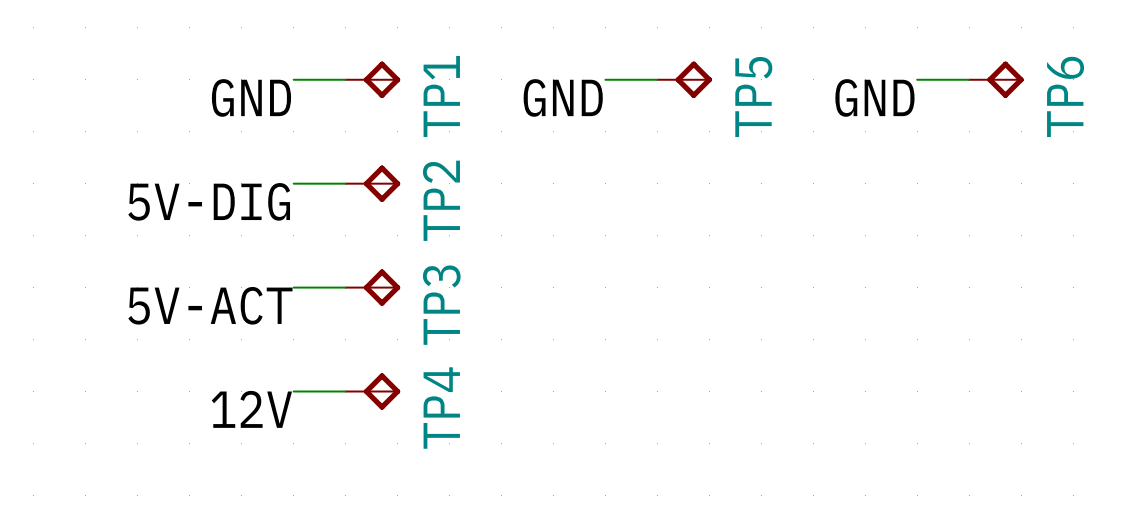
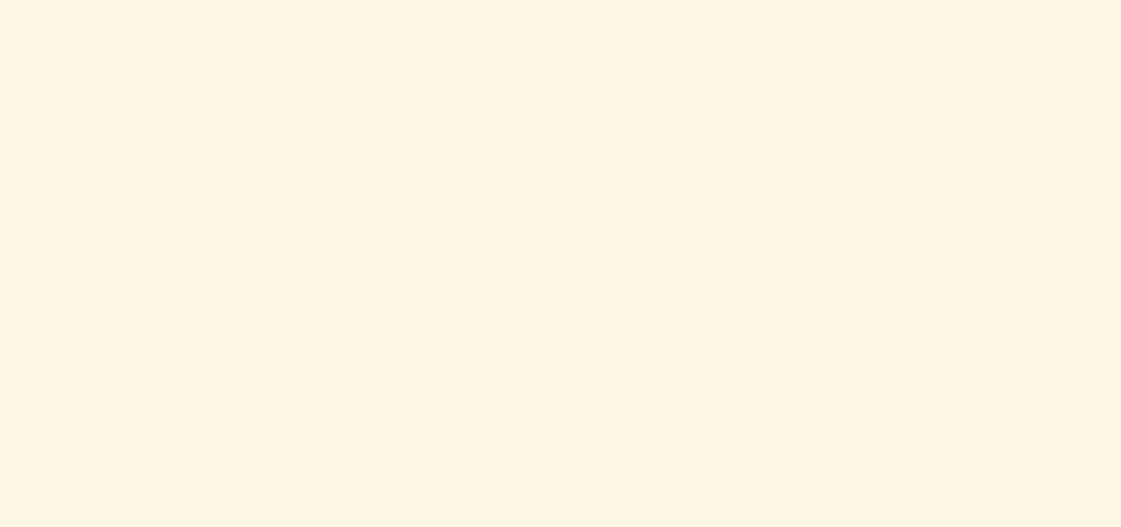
wire: (293, 79) (345, 79) -> none
TP1: (372, 79) -> none
wire: (605, 79) (657, 79) -> none
TP5: (684, 79) -> none
wire: (917, 79) (969, 79) -> none
TP6: (996, 79) -> none
label: GND (251, 97) -> none
label: GND (563, 97) -> none
label: GND (874, 97) -> none
wire: (293, 183) (345, 183) -> none
TP2: (372, 183) -> none
label: 5V-DIG (209, 201) -> none
wire: (293, 287) (345, 287) -> none
TP3: (372, 287) -> none
label: 5V-ACT (210, 305) -> none
wire: (293, 391) (345, 391) -> none
TP4: (372, 391) -> none
label: 12V (251, 409) -> none

